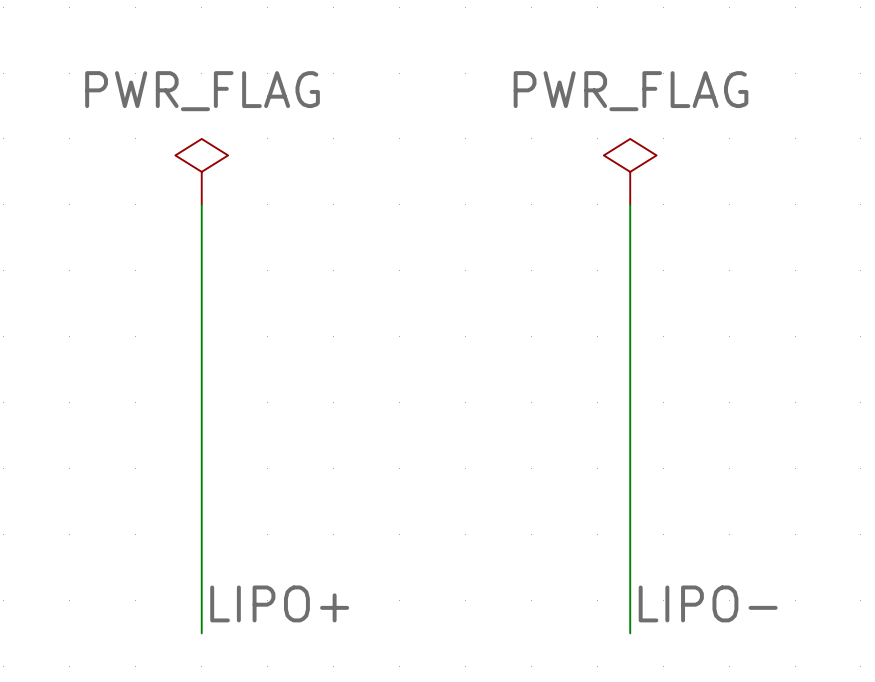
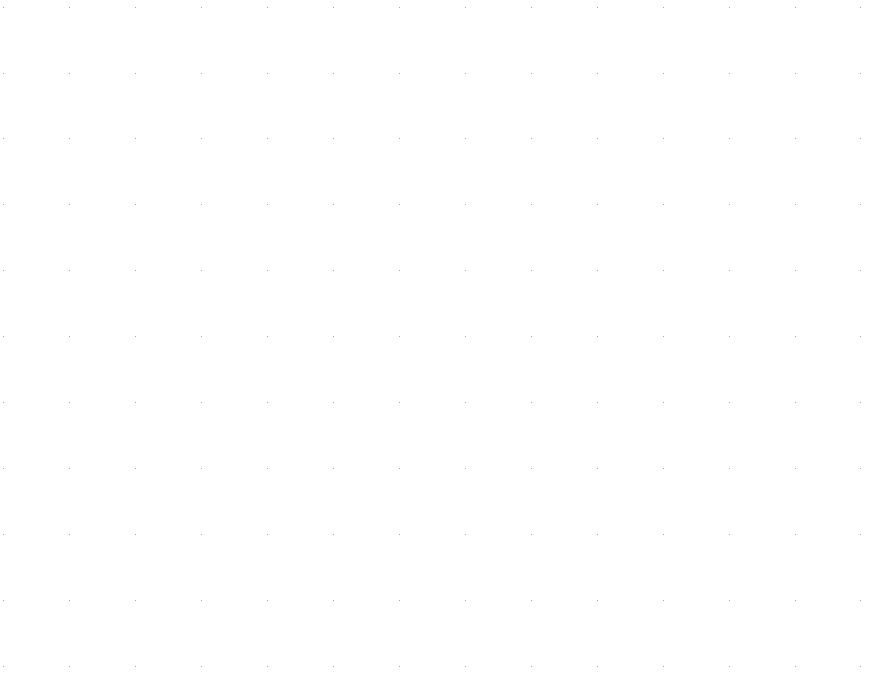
power symbol: PWR_FLAG (201, 171) -> none
power symbol: PWR_FLAG (630, 171) -> none
wire: (201, 204) (201, 633) -> none
wire: (630, 204) (630, 633) -> none
label: LIPO+ (279, 603) -> none
label: LIPO- (708, 603) -> none

